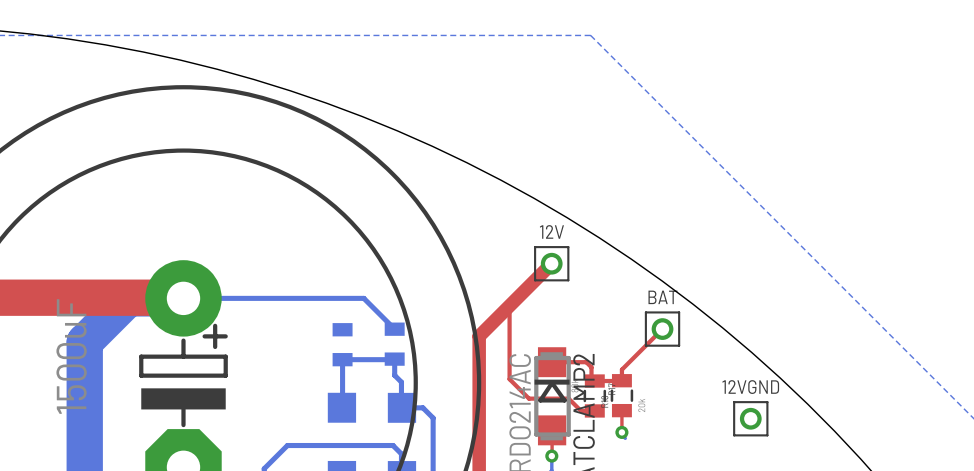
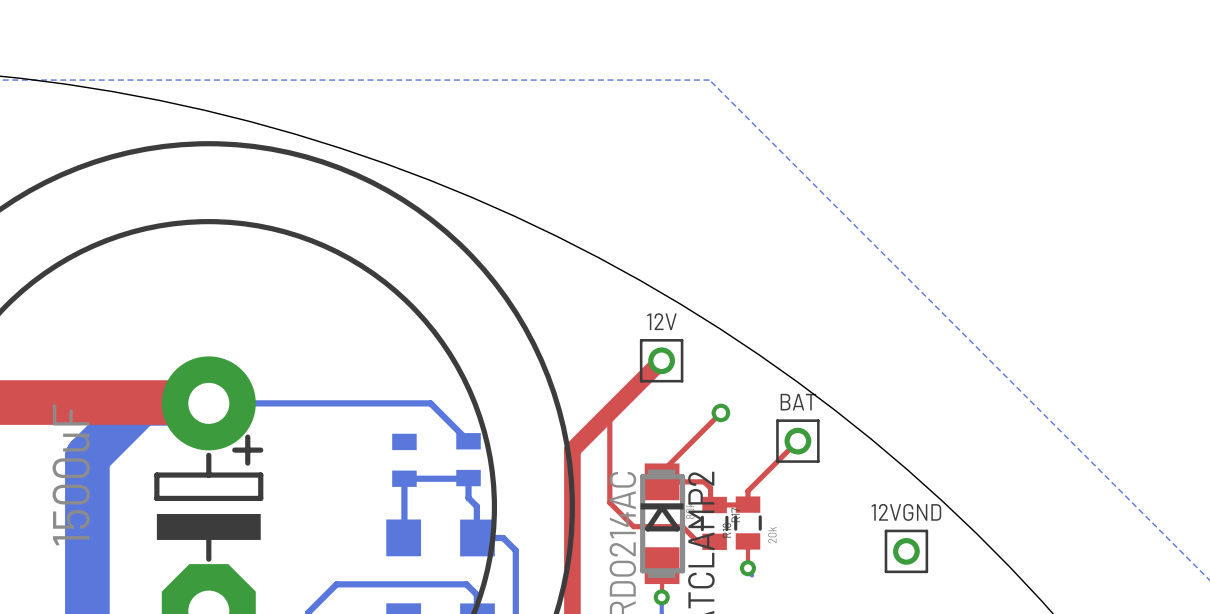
top track: none -> (720, 412) (662, 471) (662, 481)
via: none -> (720, 412)

